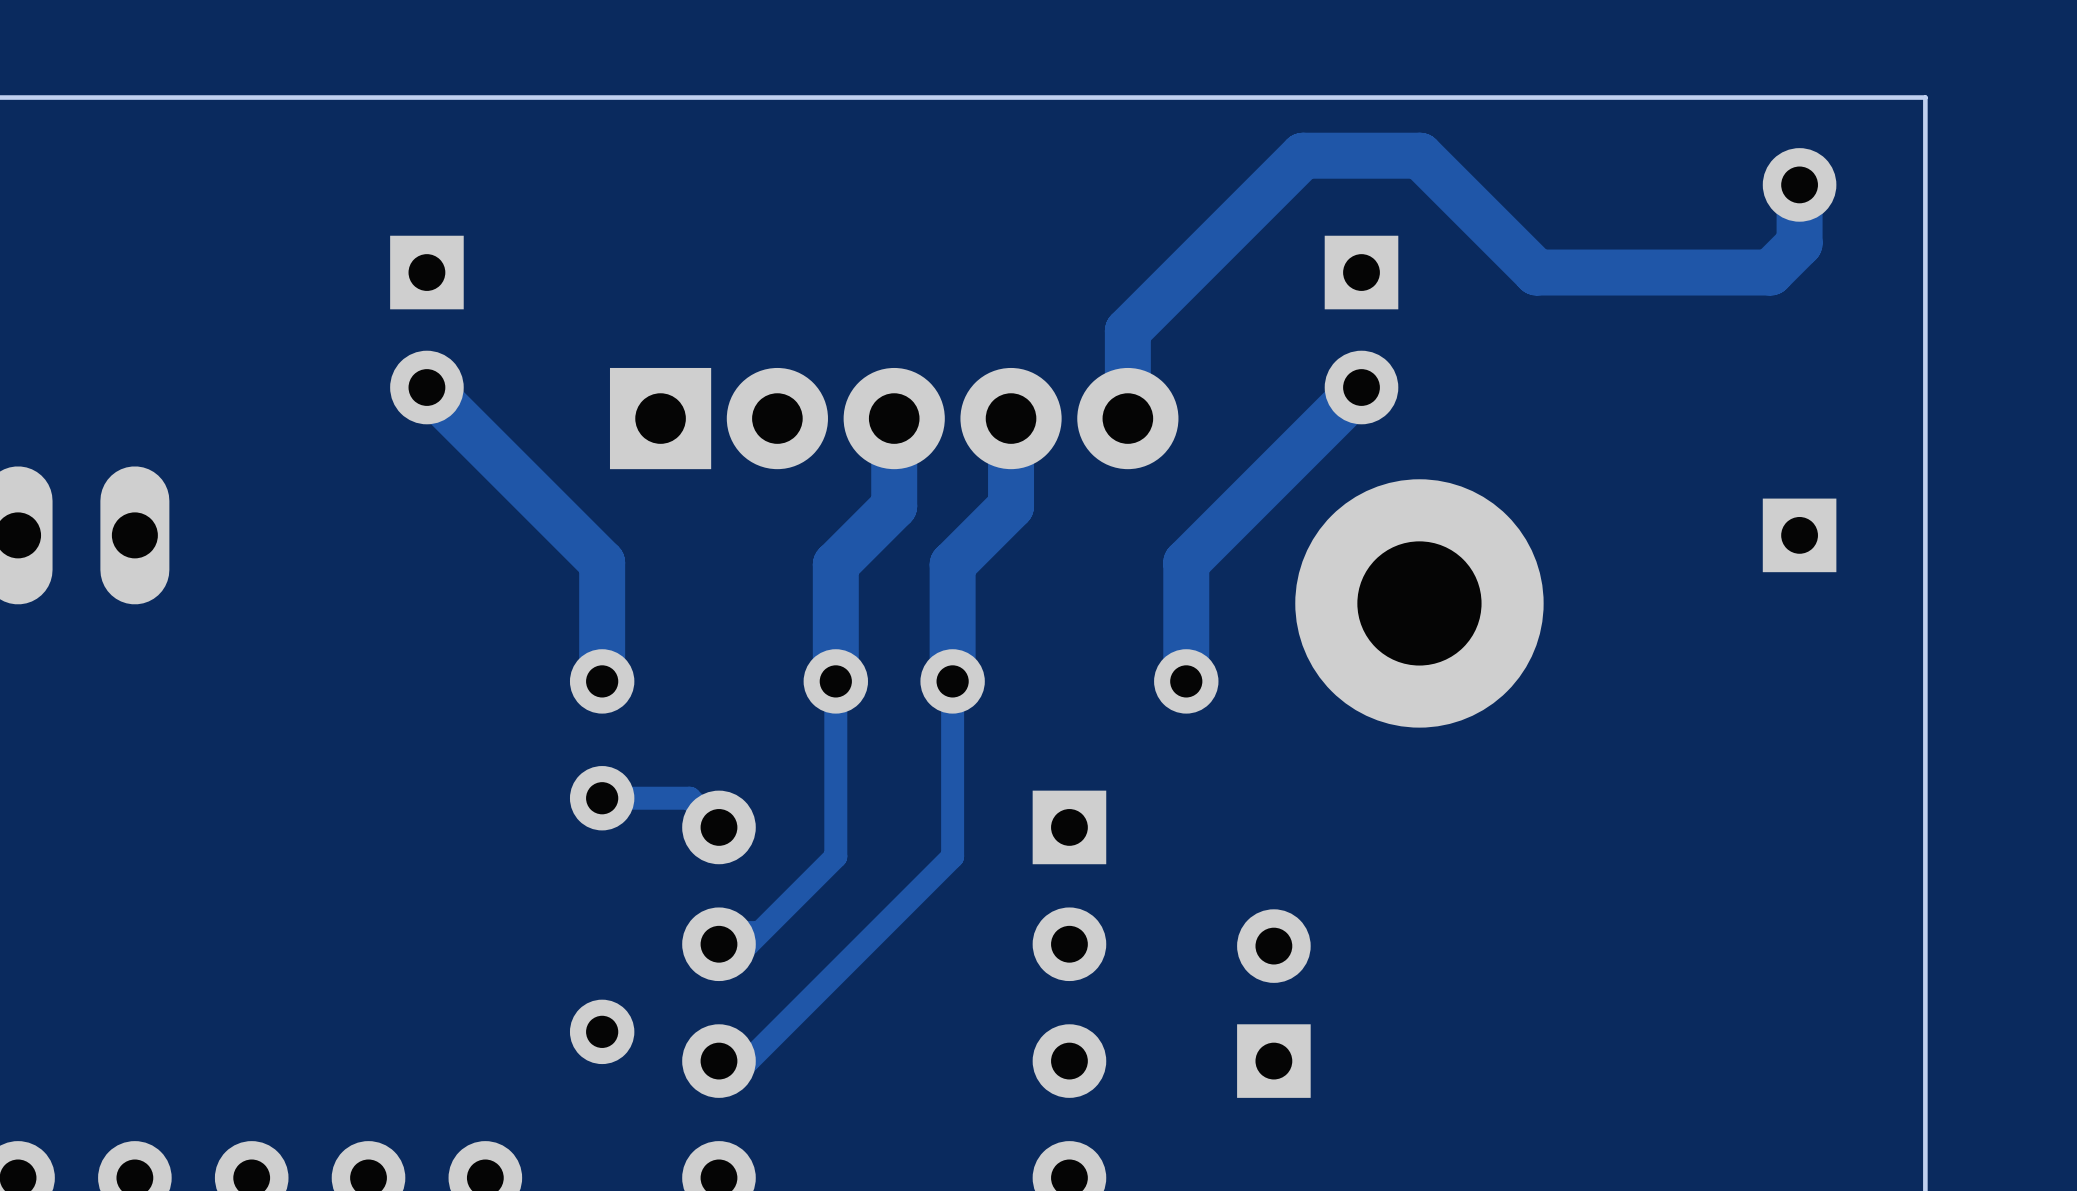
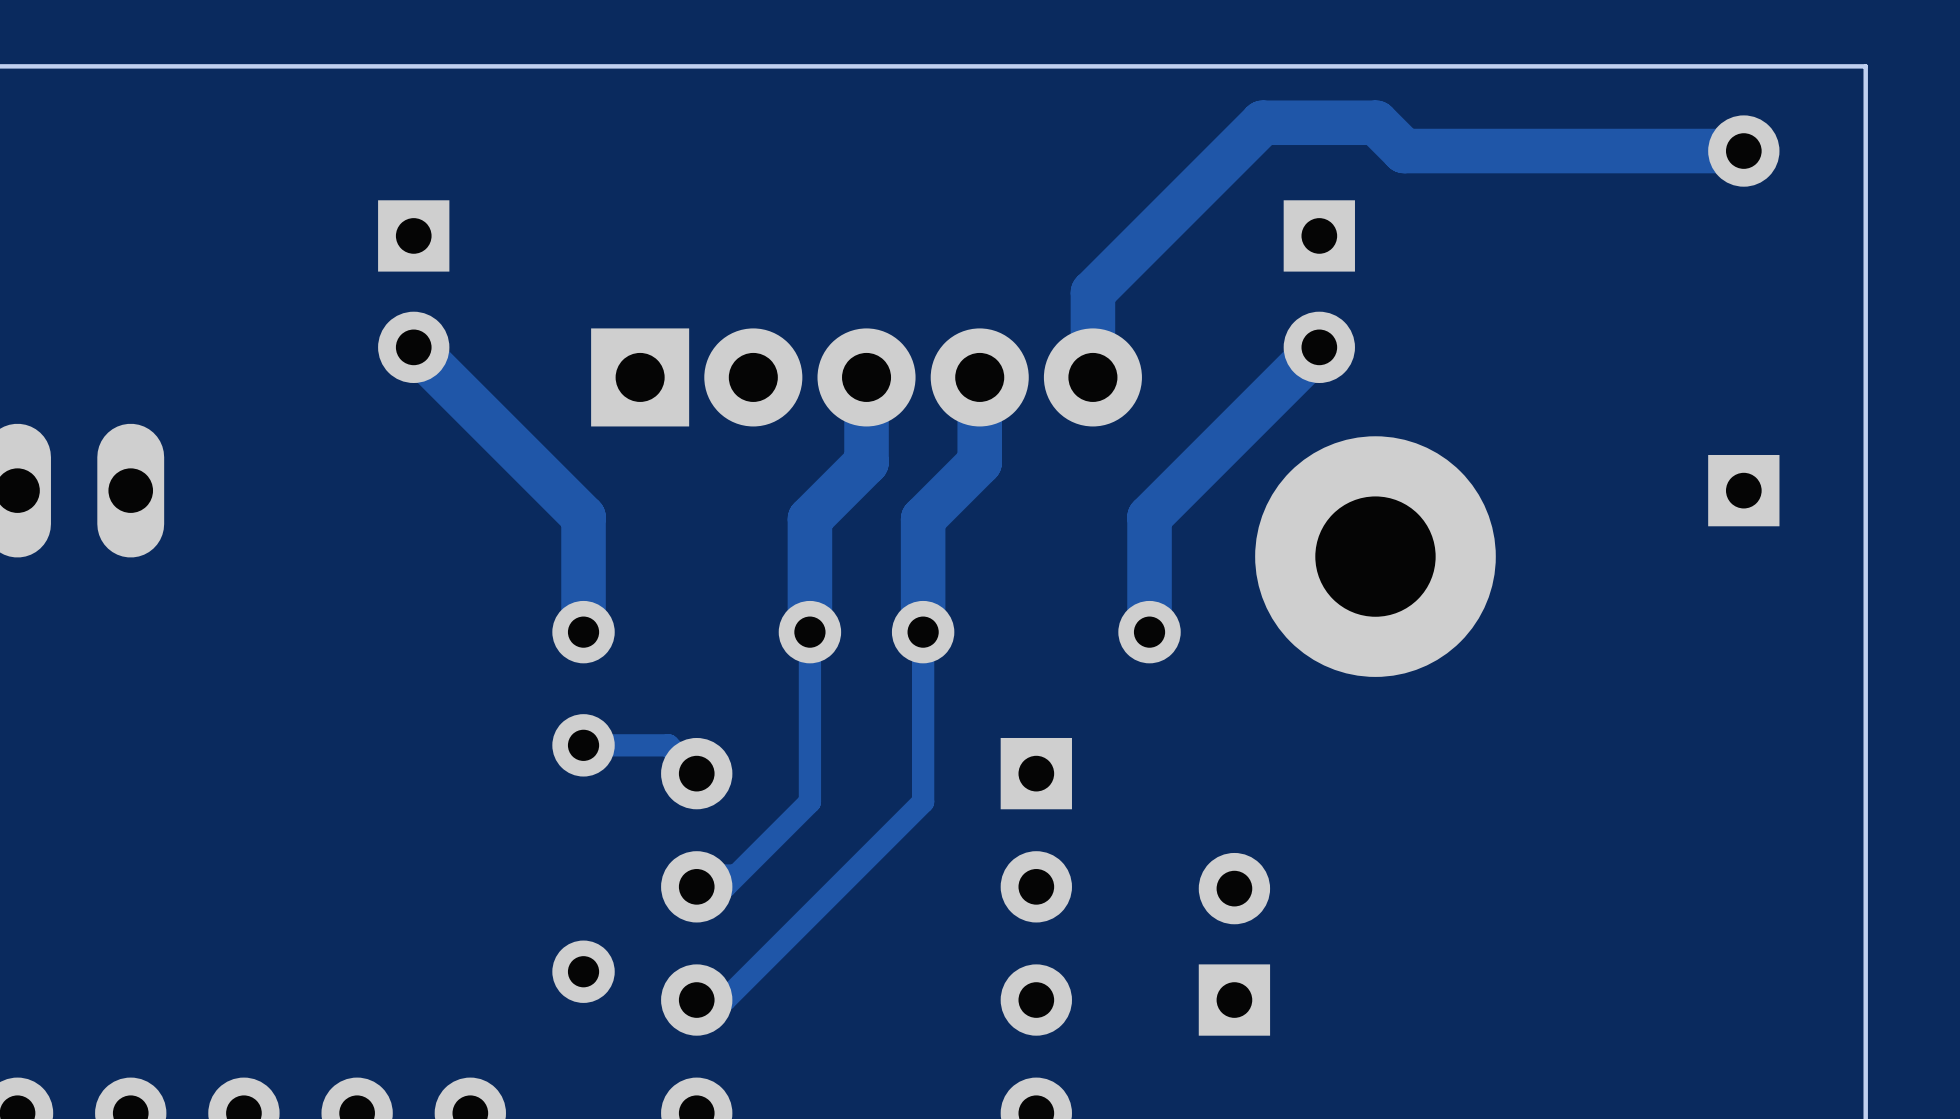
track: (1799, 184) (1799, 243) (1770, 272) (1536, 272) (1449, 184) -> (1743, 151) (1404, 151)

